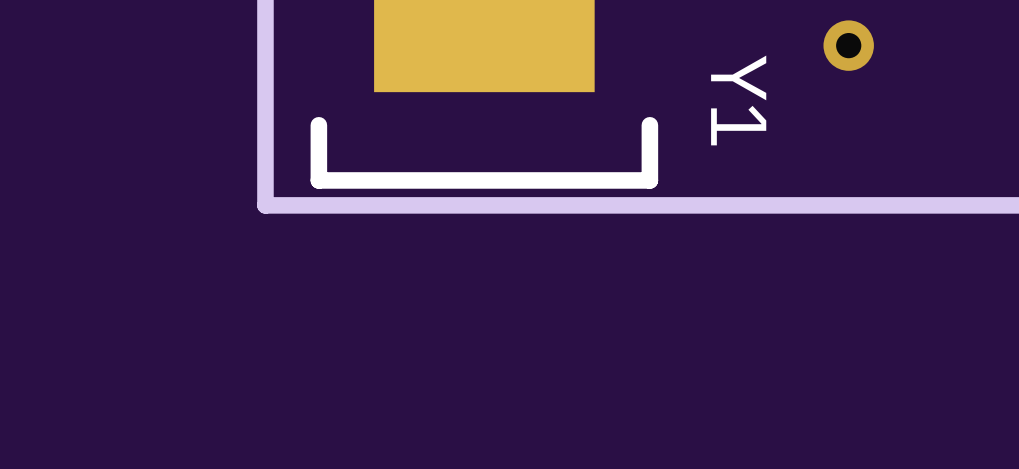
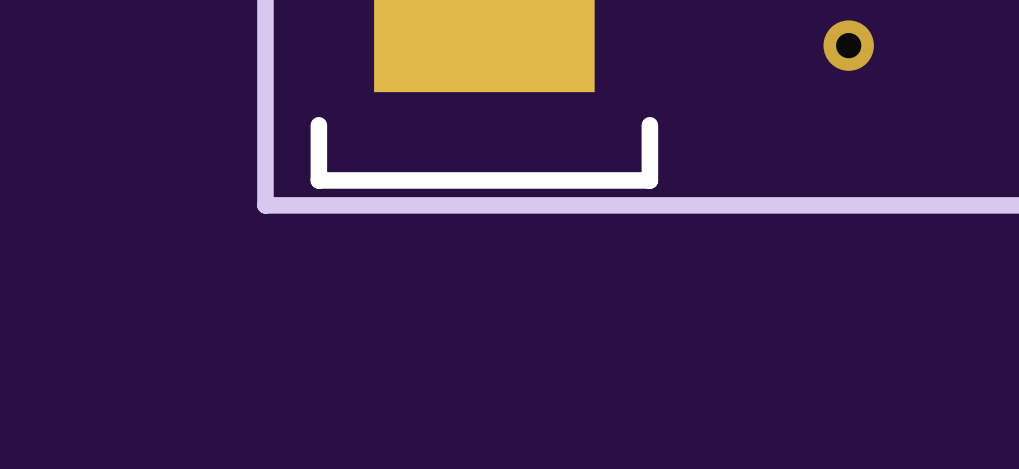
Y1 name: Y1 (738, 100) -> none

